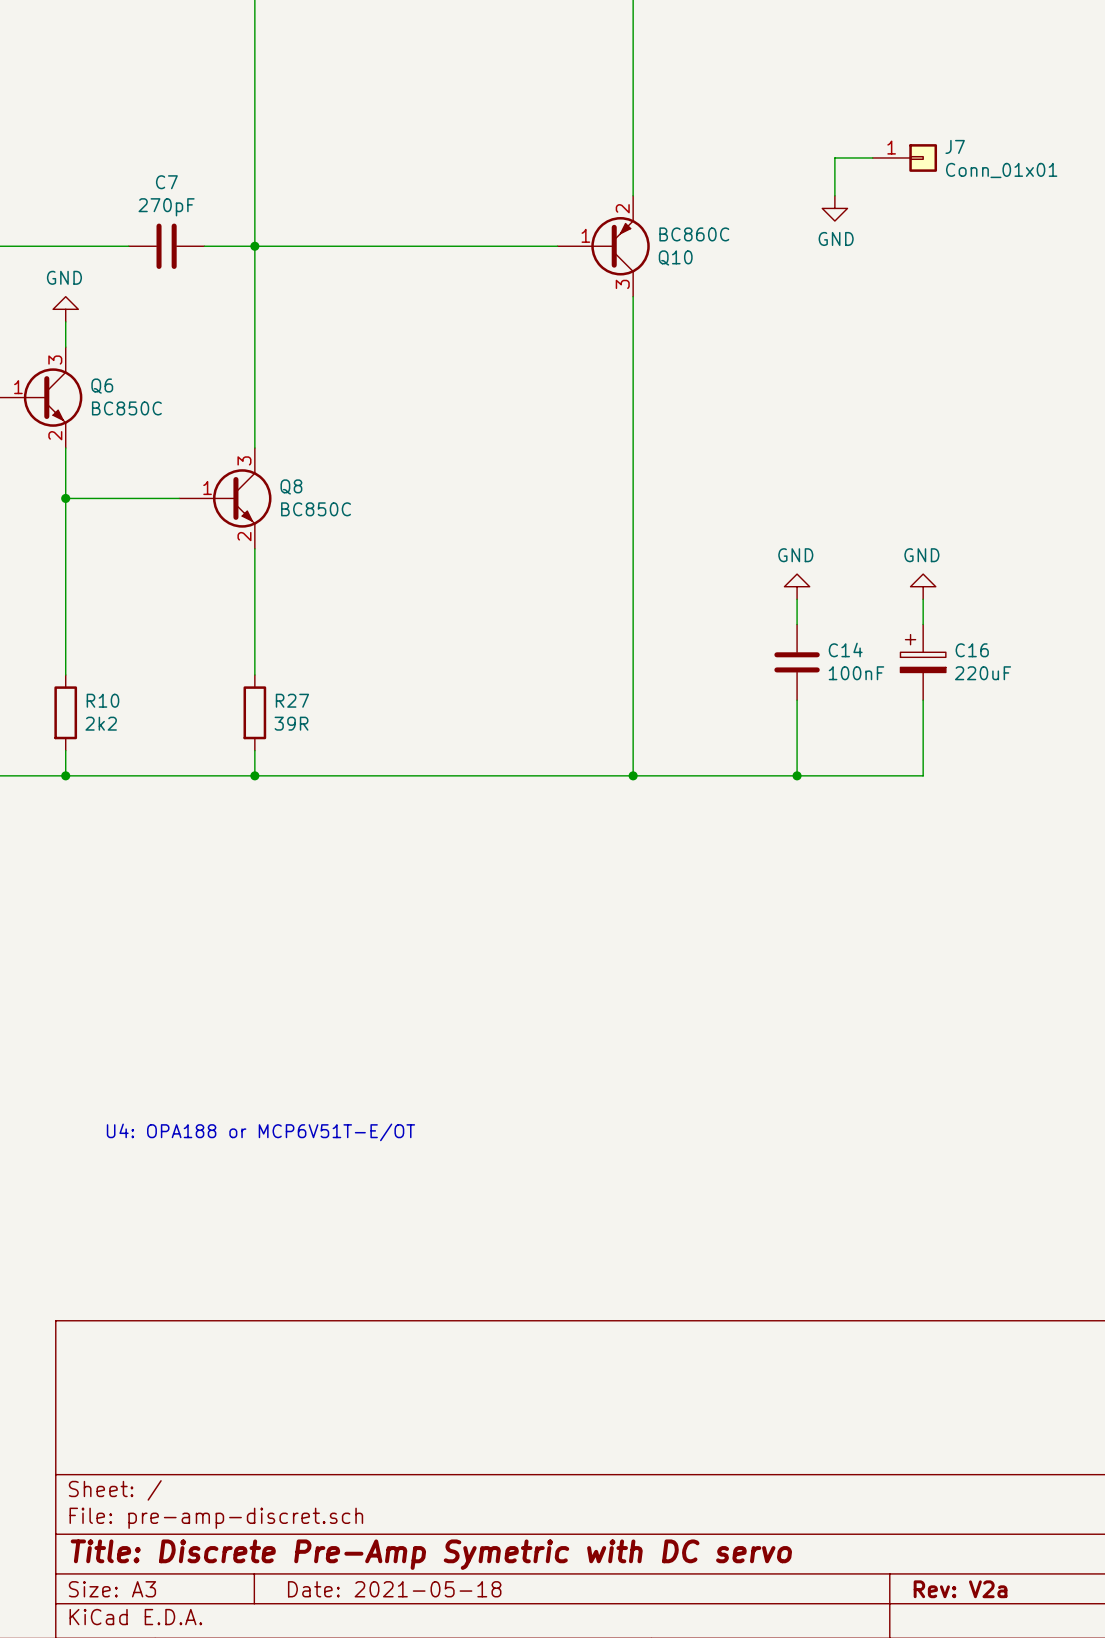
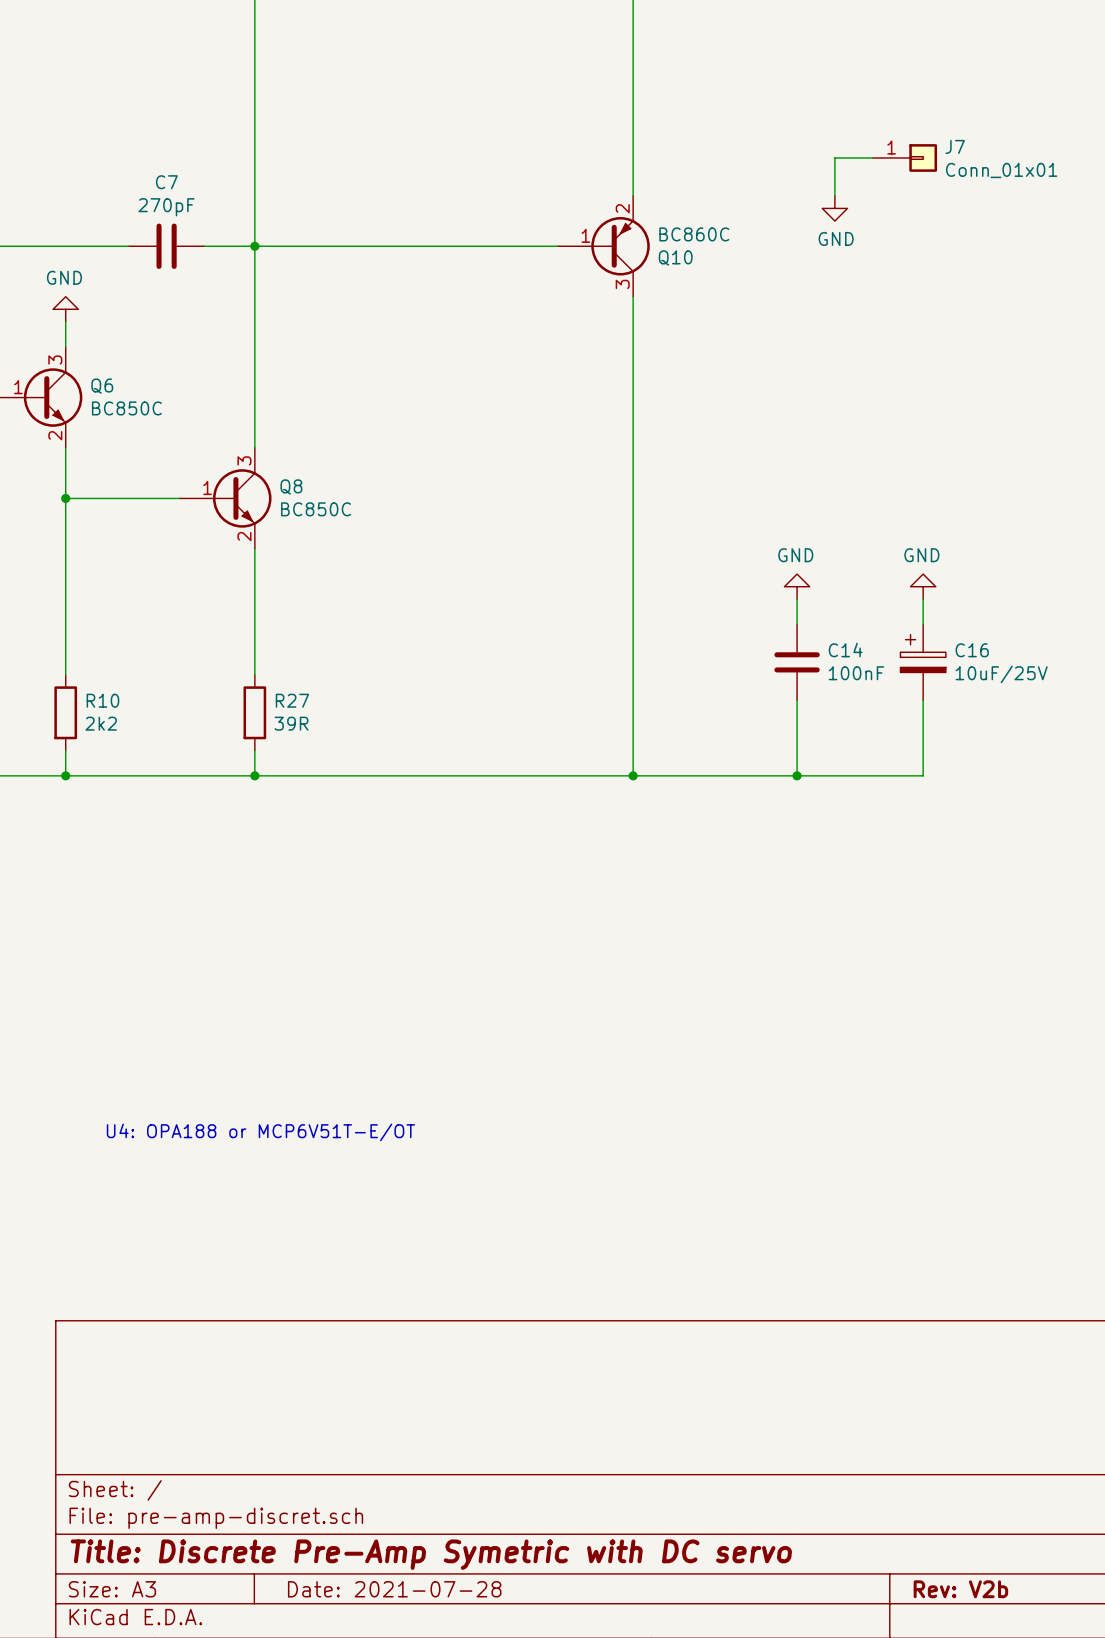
C16 value: 220uF (983, 673) -> 10uF/25V (1001, 674)
title block: Date: 2021-05-18 (394, 1589) -> Date: 2021-07-28 (394, 1589)
title block: Rev: V2a (960, 1589) -> Rev: V2b (960, 1589)

